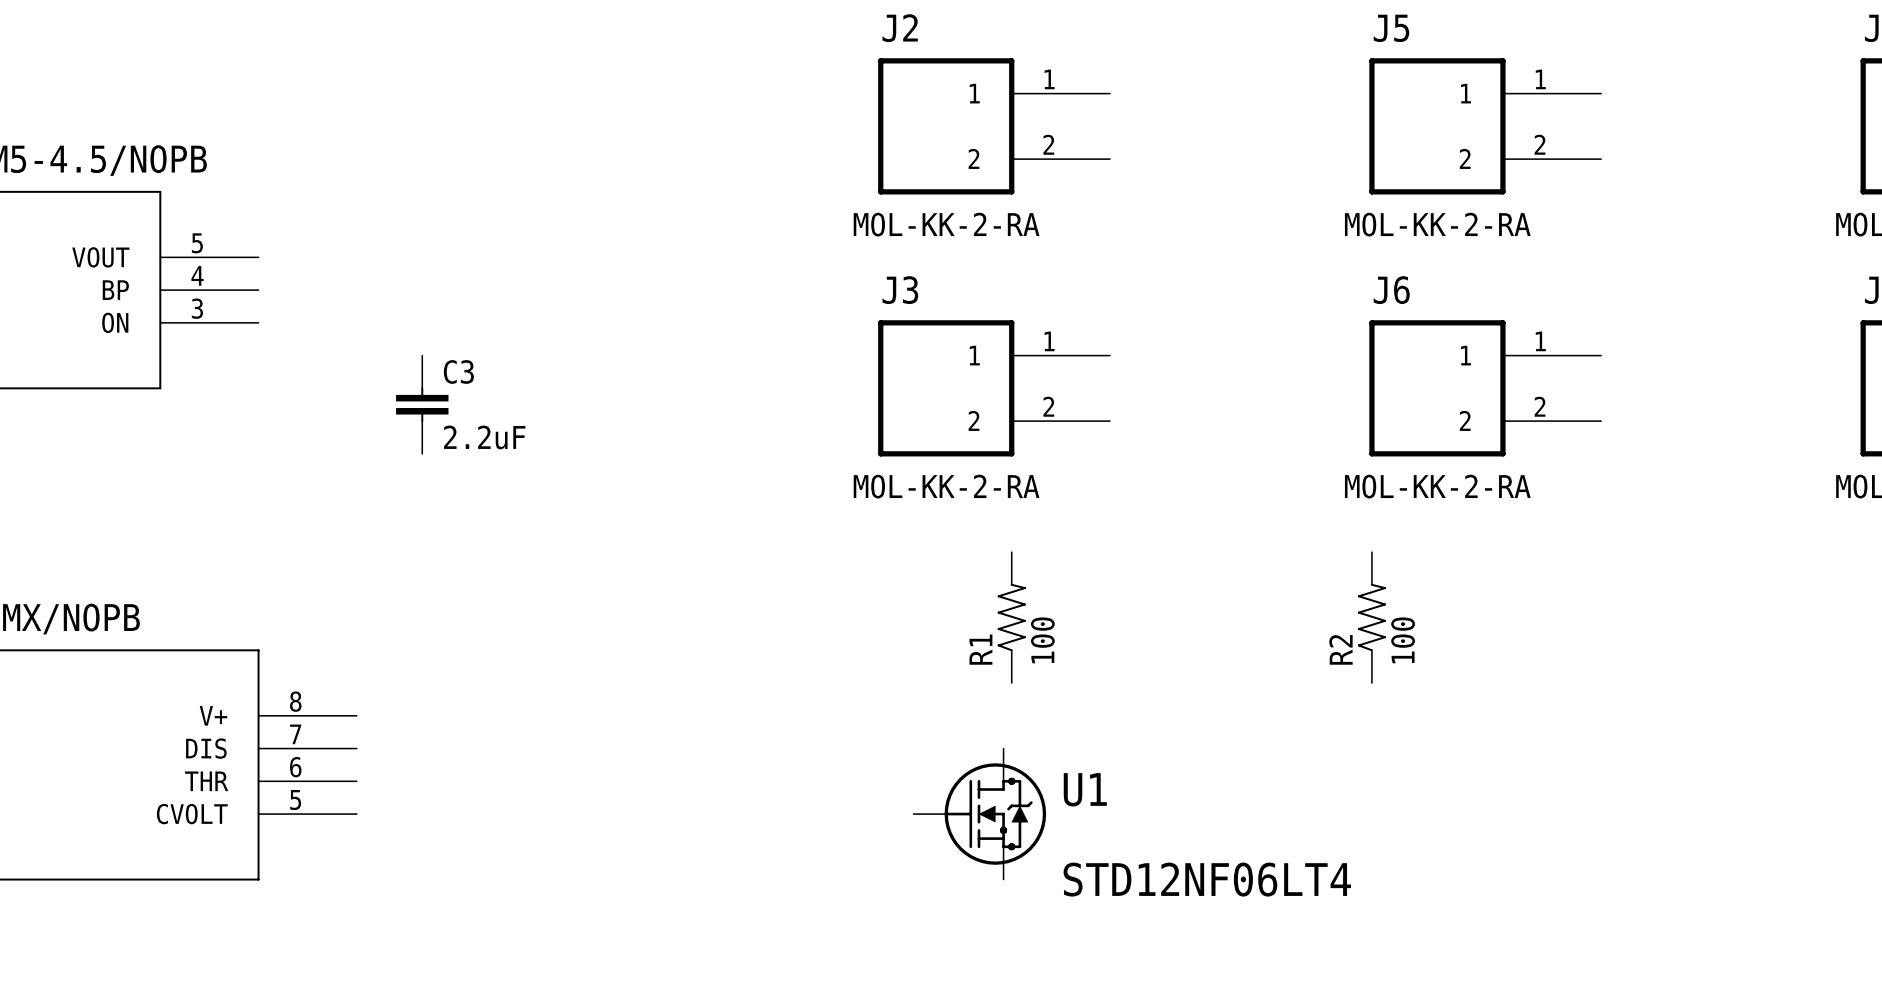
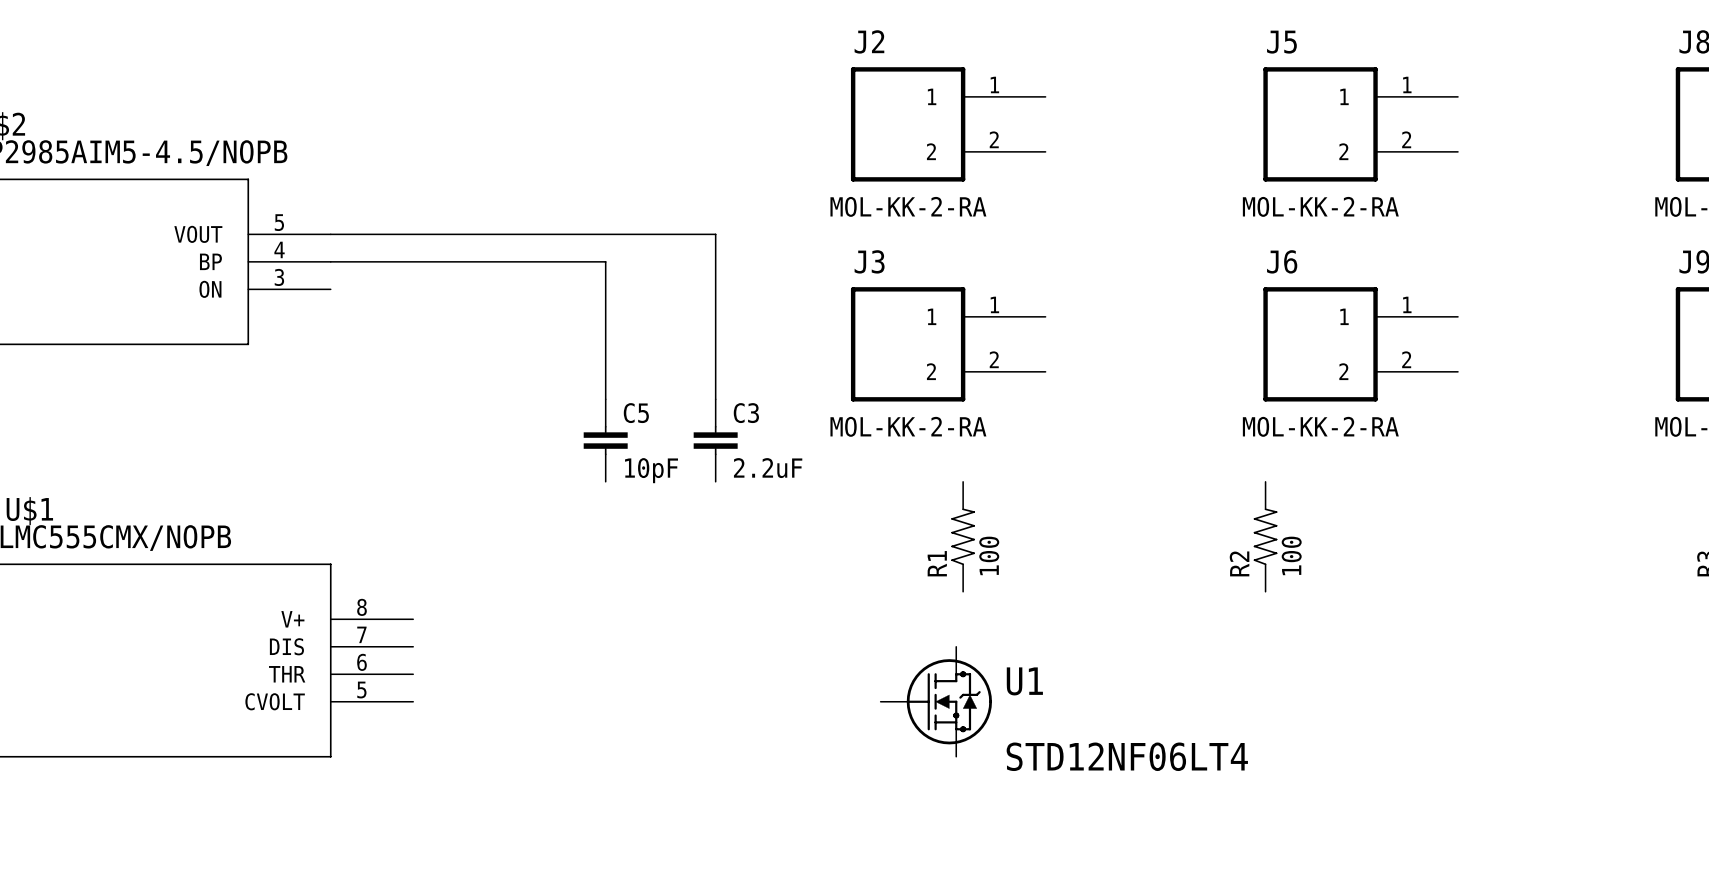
wire: none -> (330, 234) (715, 234) (715, 399)
wire: none -> (330, 261) (605, 261) (605, 399)
C3 position: (422, 404) -> (715, 440)
C5: none -> 10pF (605, 440)

